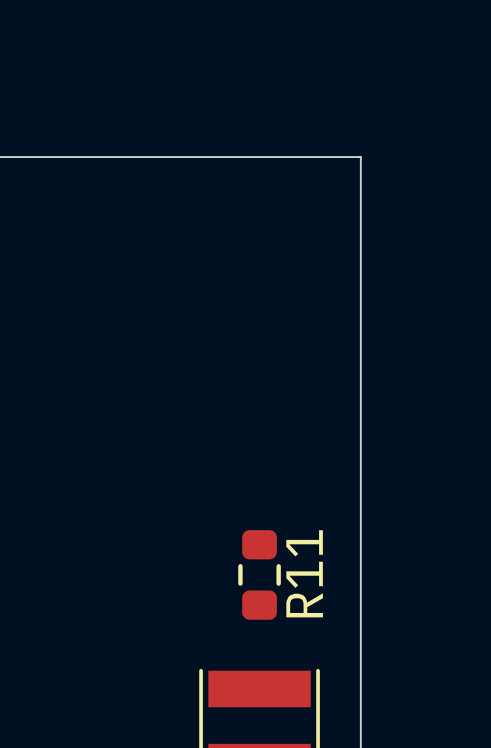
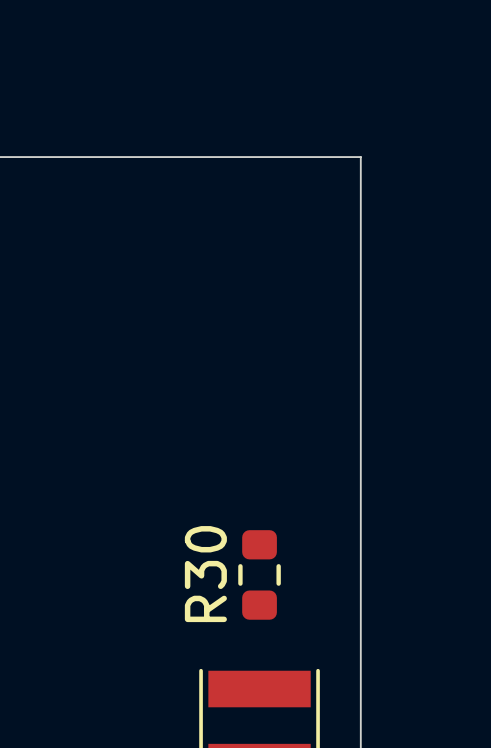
R11 name: R11 (304, 573) -> R30 (205, 574)

